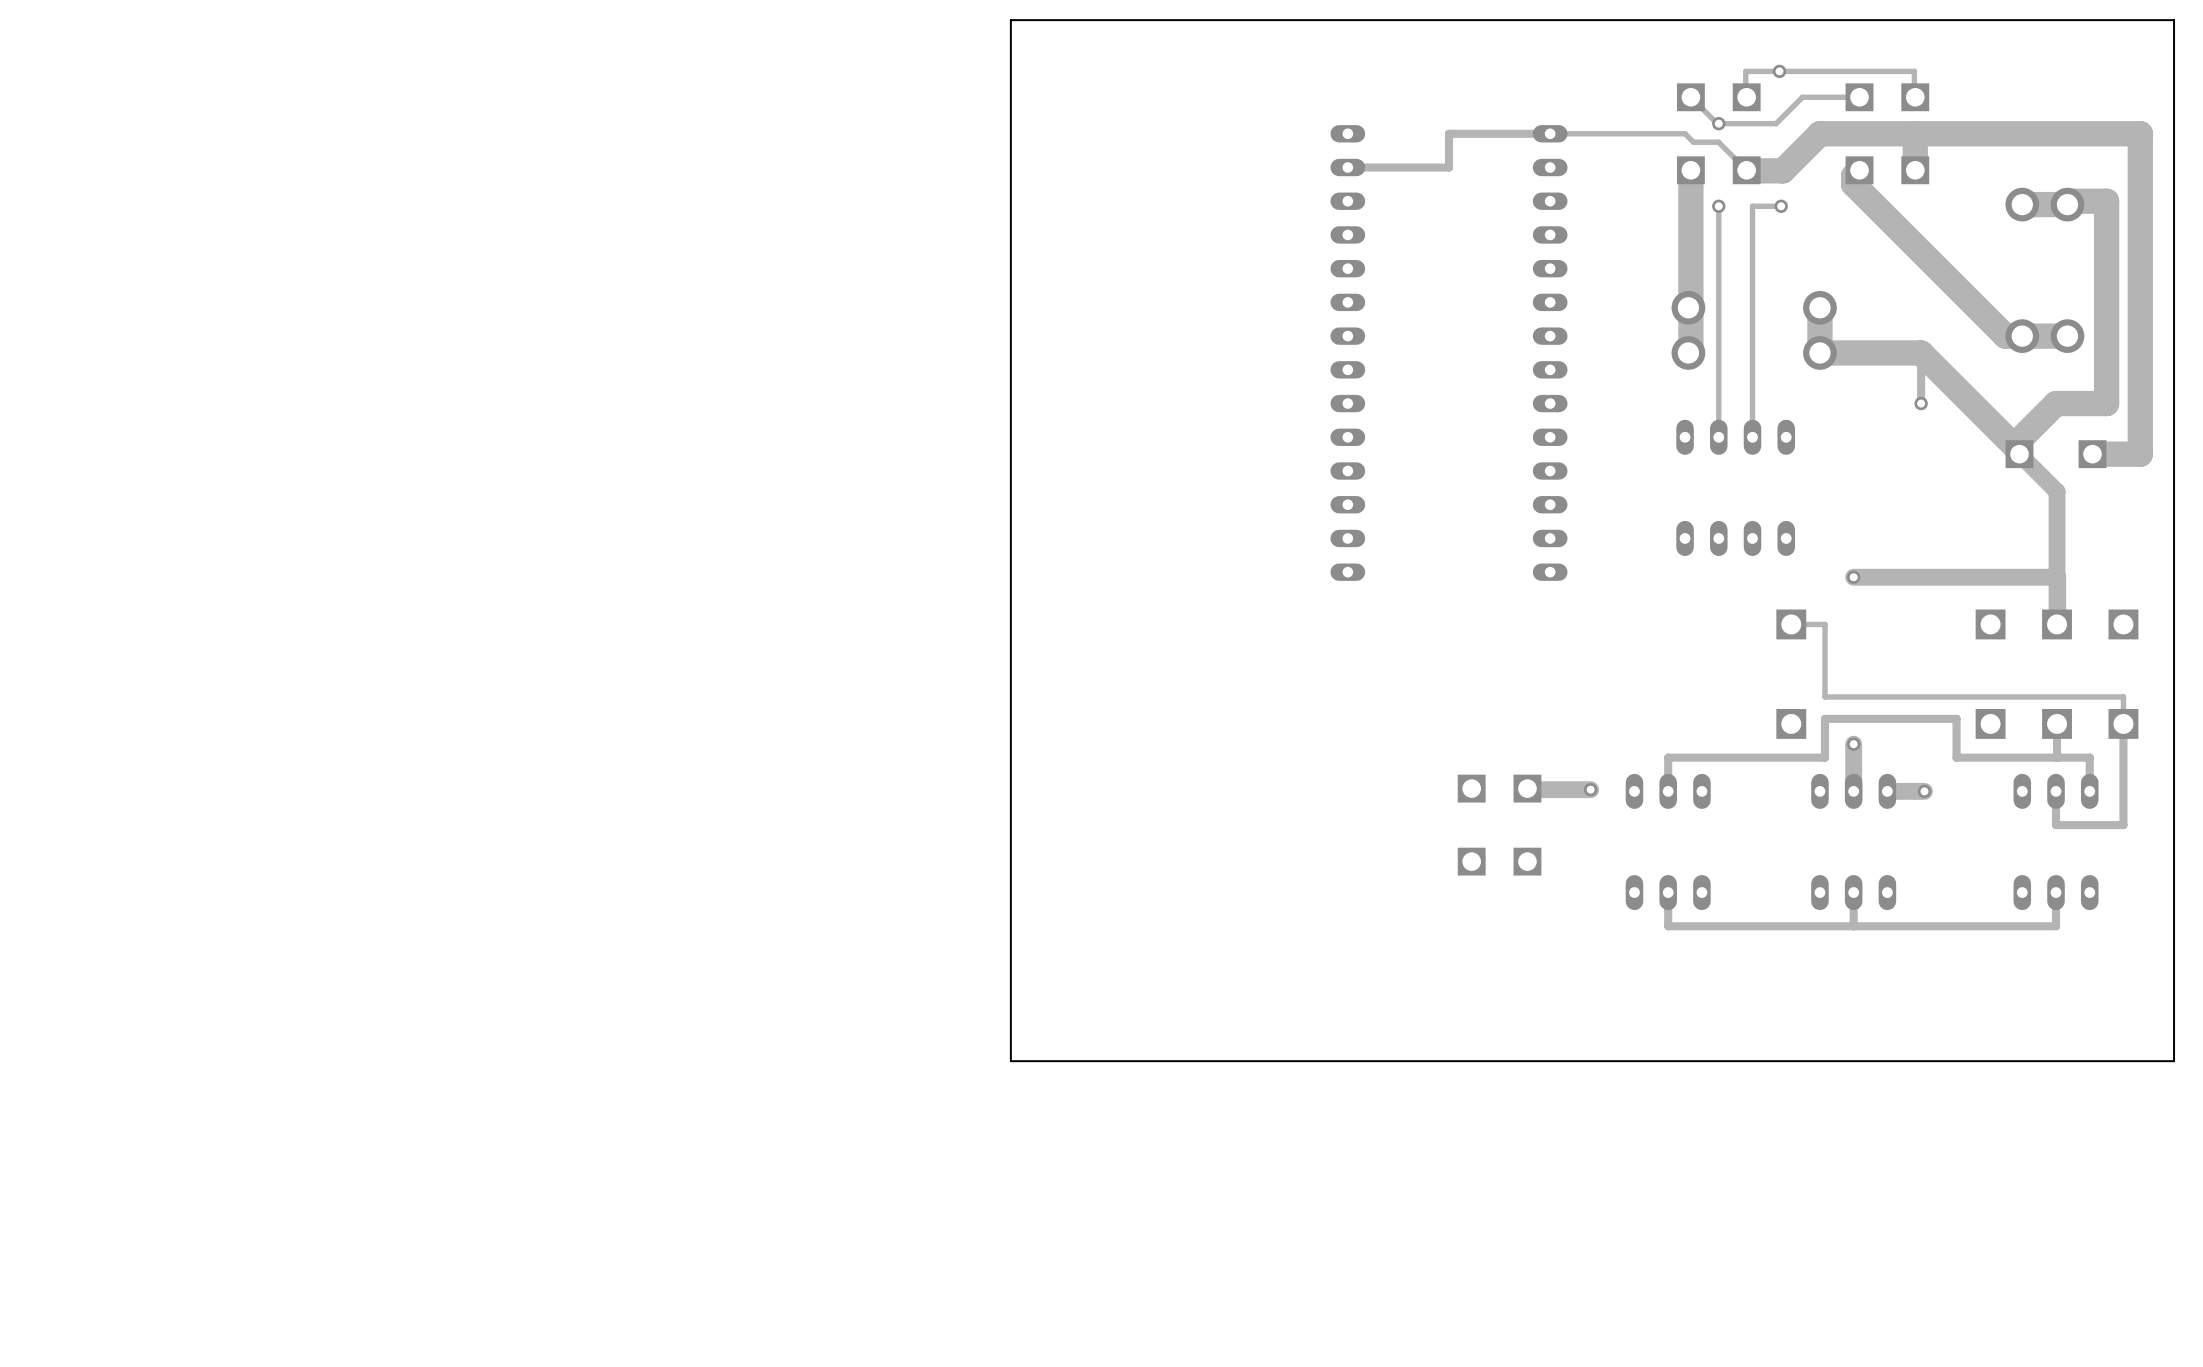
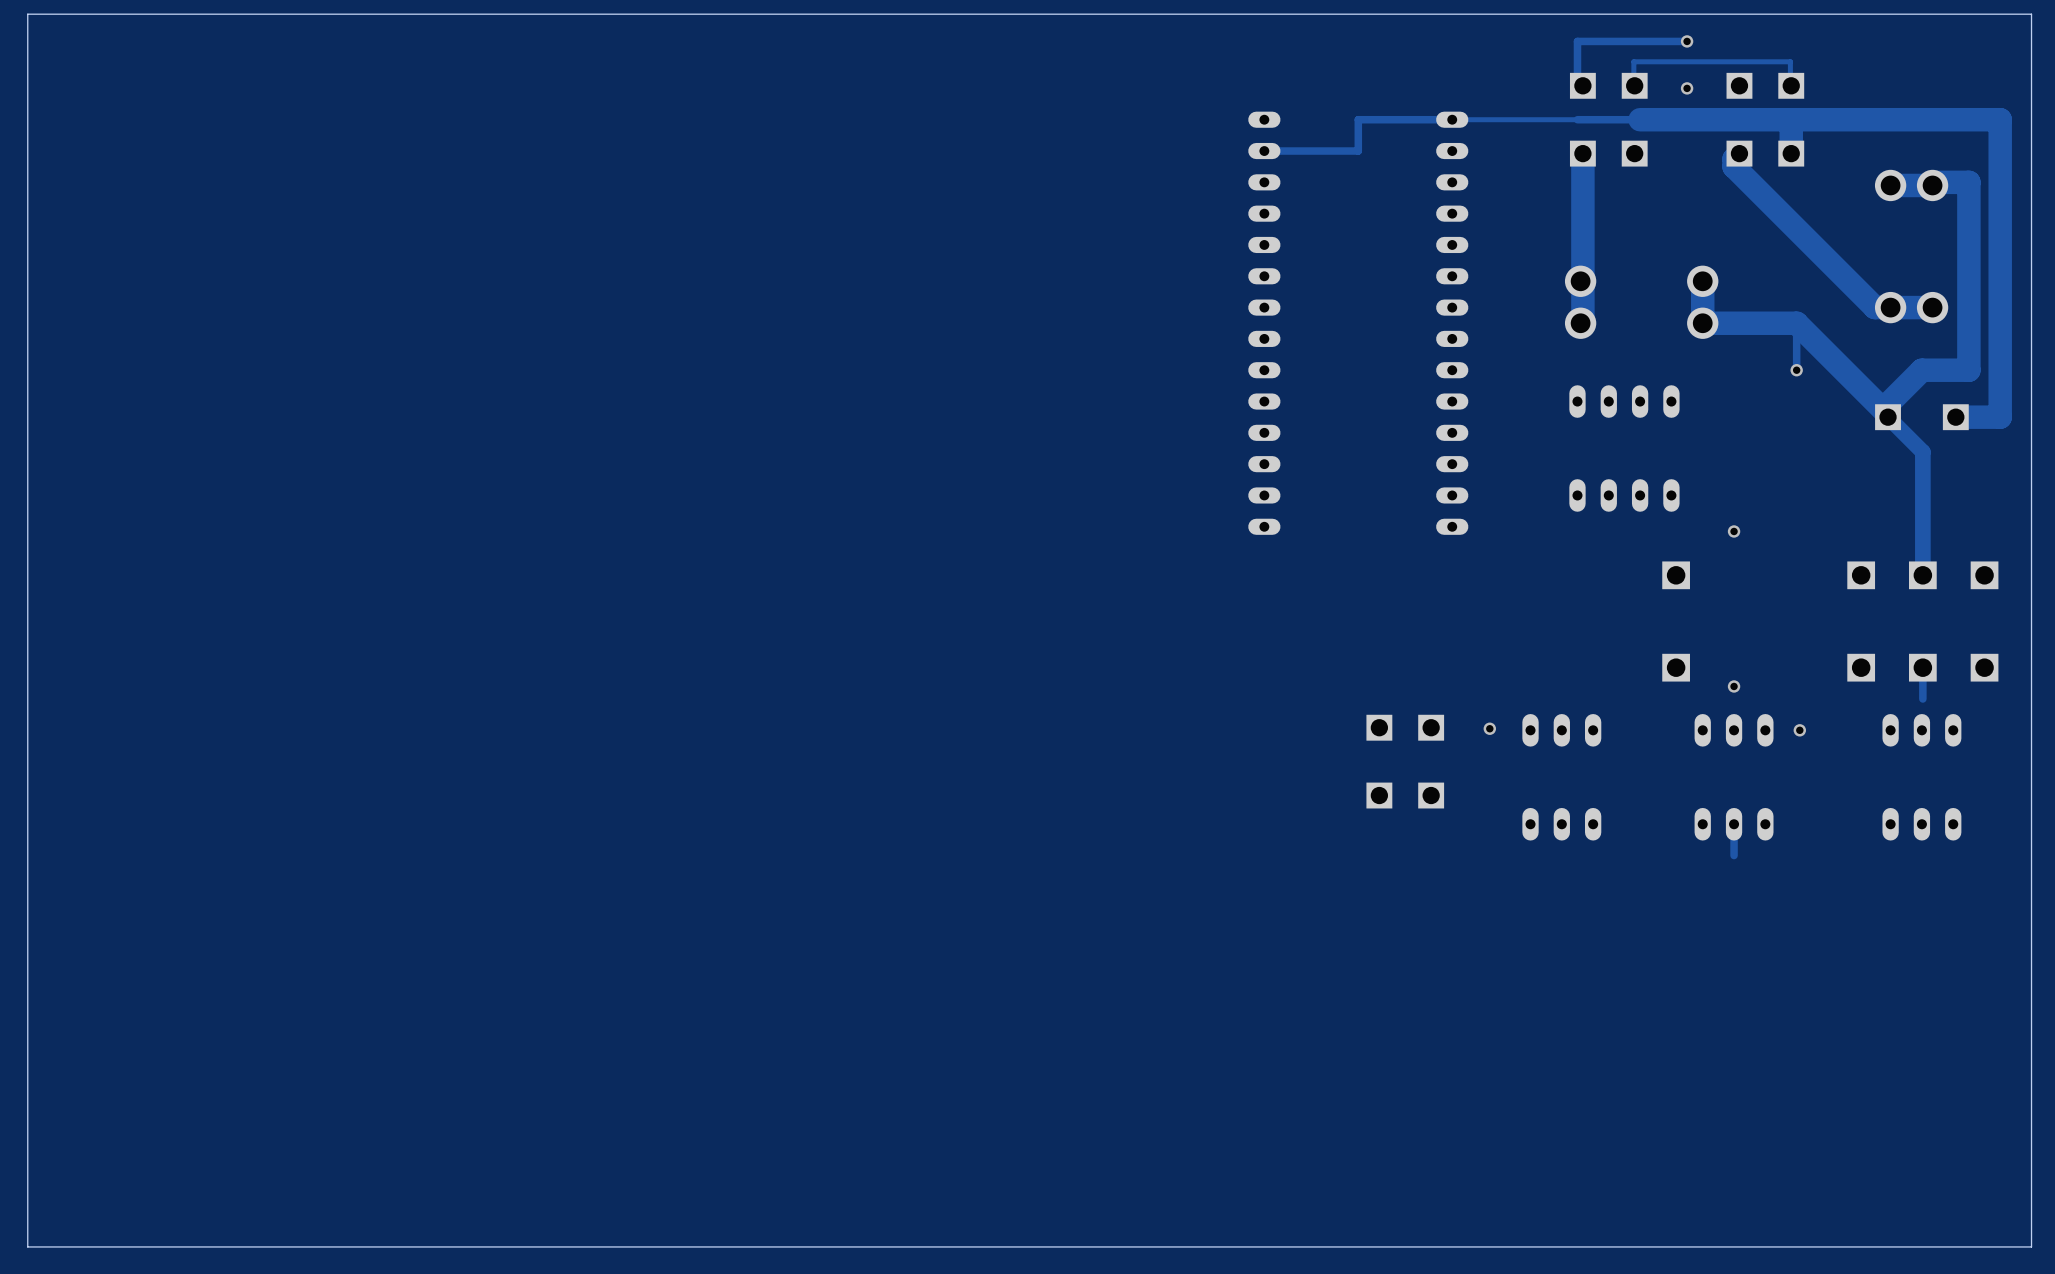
board edge: (1010, 20) (1010, 1061) (2174, 1061) -> (951, 14) (27, 14) (27, 1246) (2031, 1246) (2031, 980)
via: none -> (1687, 41)
via: (1779, 71) -> none
track: (1859, 97) (1802, 97) (1776, 123) (1717, 123) (1690, 97) -> (1687, 41) (1577, 41) (1577, 85) (1582, 85)
via: none -> (1687, 88)
via: (1718, 123) -> none
track: (1819, 133) (1782, 170) (1747, 170) (1718, 142) (1693, 142) (1685, 133) -> (1702, 119) (1577, 119)
track: (1718, 206) (1718, 437) -> none
via: (1718, 206) -> none
track: (1781, 206) (1752, 206) (1752, 437) -> none
via: (1781, 206) -> none
track: (1853, 577) (2057, 577) (2057, 624) -> none
track: (1791, 624) (1825, 624) (1825, 696) (2123, 696) (2123, 825) (2056, 825) (2056, 791) -> none
track: (1853, 744) (1853, 791) -> none
track: (1527, 788) (1590, 789) -> none
track: (1924, 791) (1887, 791) -> none
track: (2089, 791) (2089, 757) (1956, 757) (1956, 718) (1825, 718) (1825, 757) (1668, 757) (1668, 791) -> none
track: (2056, 892) (2056, 926) (1668, 926) (1668, 892) -> none

